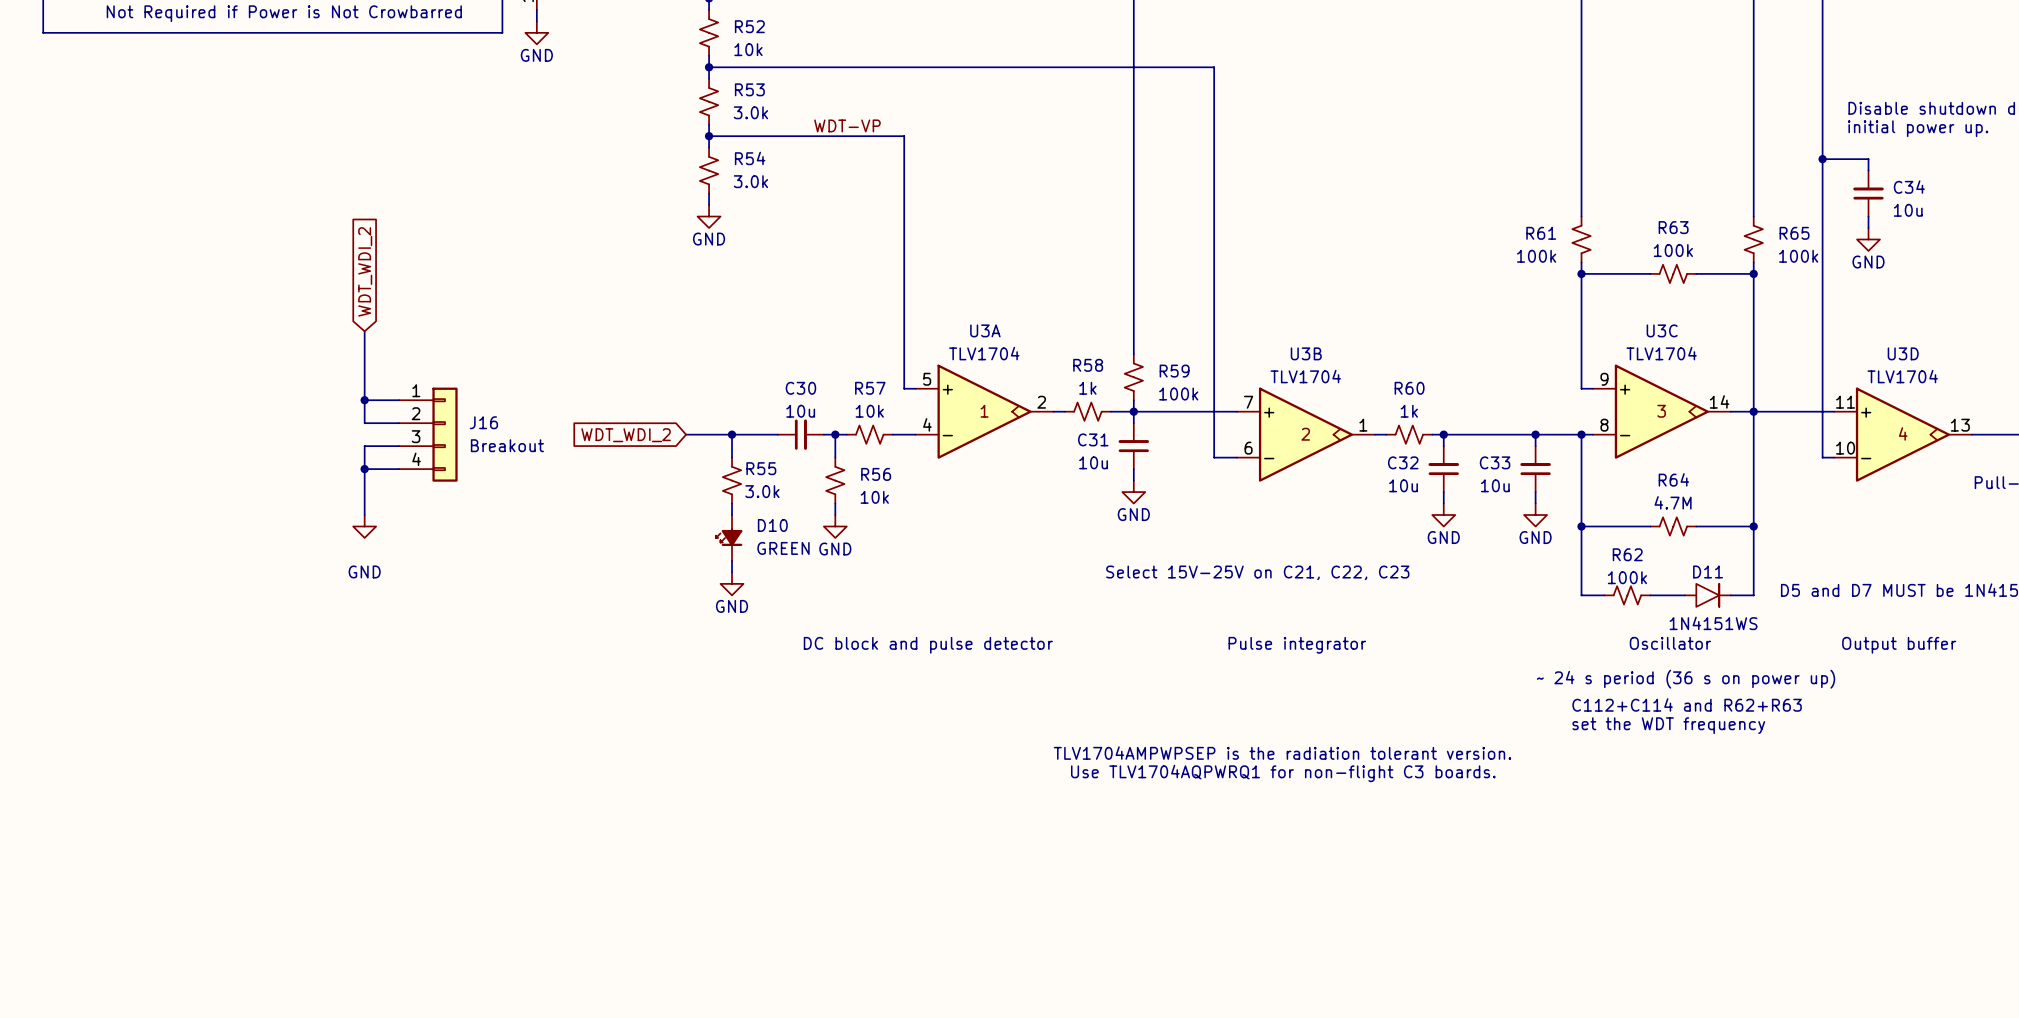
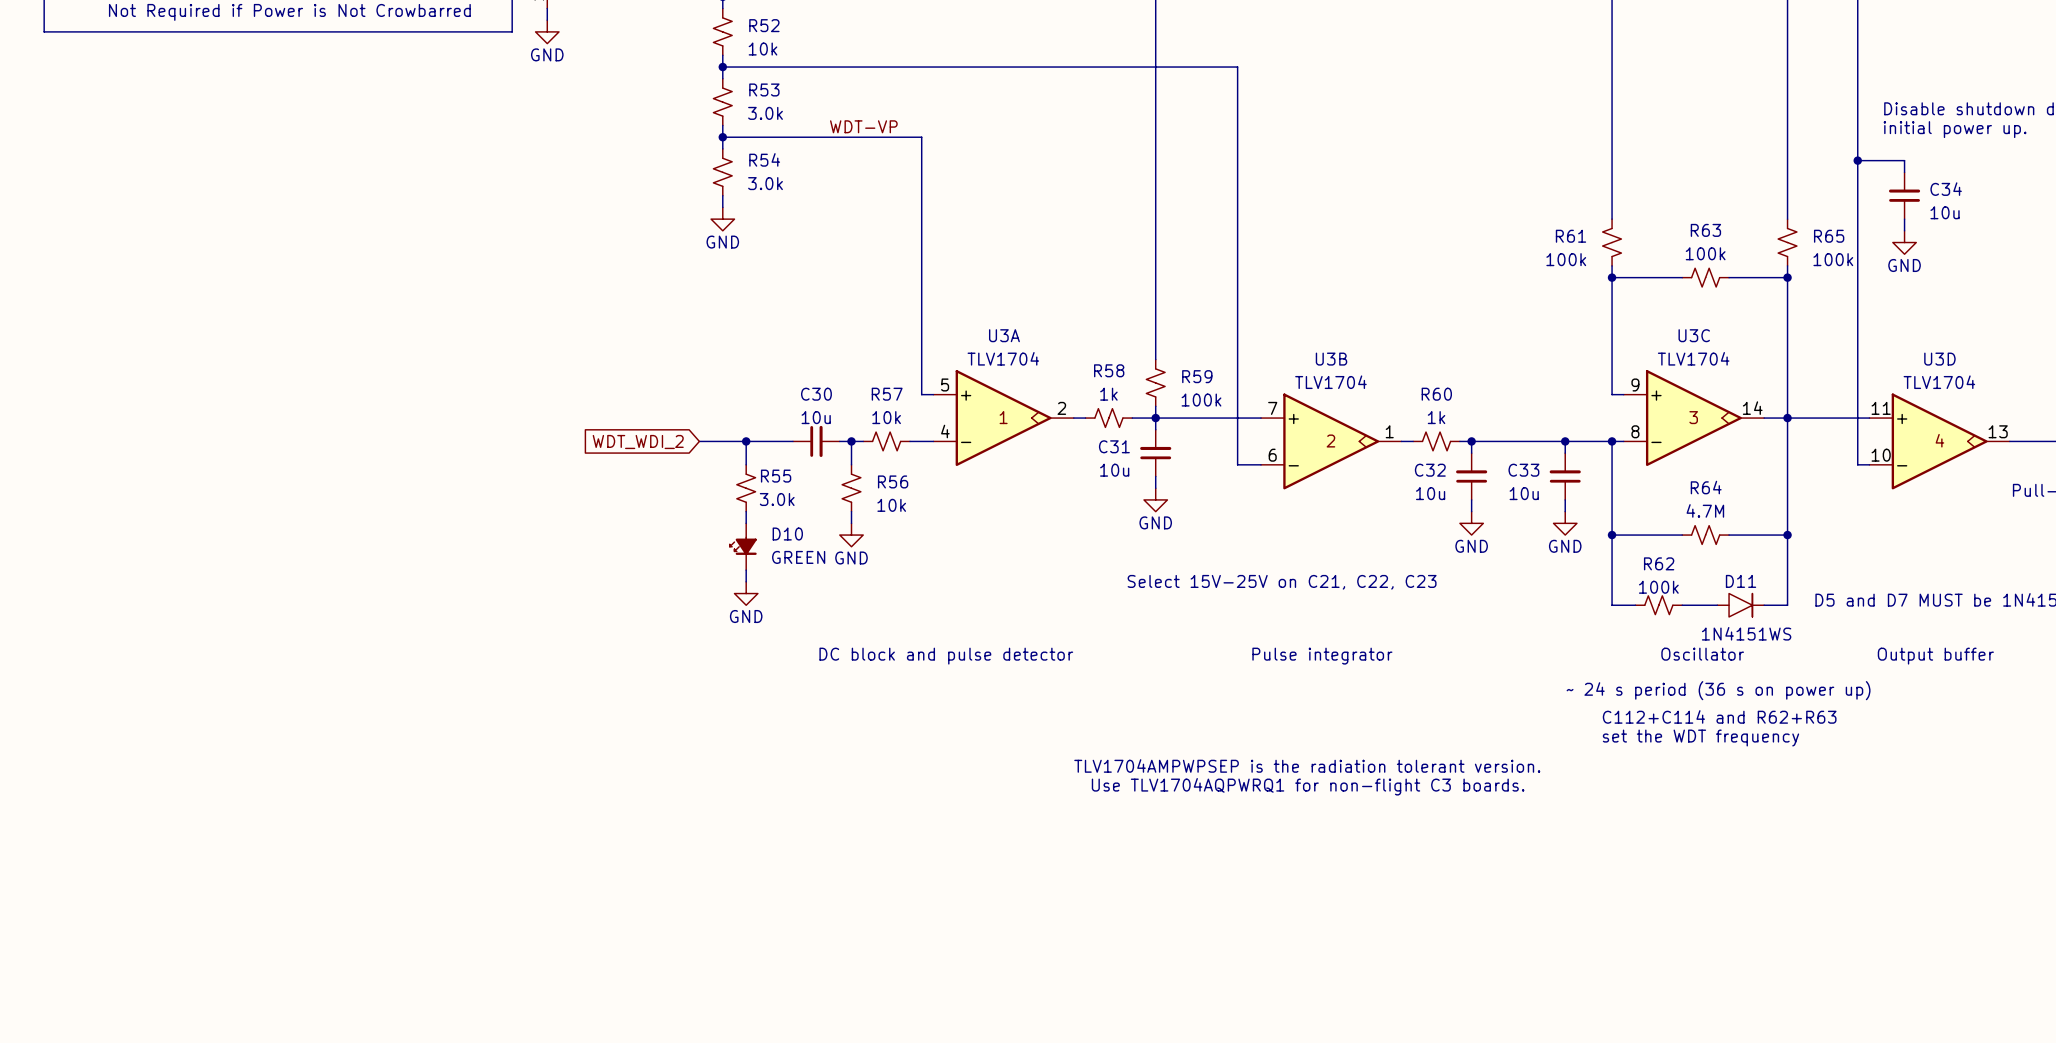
global label: WDT_WDI_2 (365, 271) -> none
wire: (364, 331) (364, 423) (399, 423) -> none
wire: (364, 400) (399, 400) -> none
junction: (364, 400) -> none
J16: Breakout (428, 434) -> none
wire: (399, 446) (364, 446) (364, 515) -> none
wire: (364, 469) (399, 469) -> none
junction: (364, 469) -> none
power symbol: GND (364, 526) -> none

